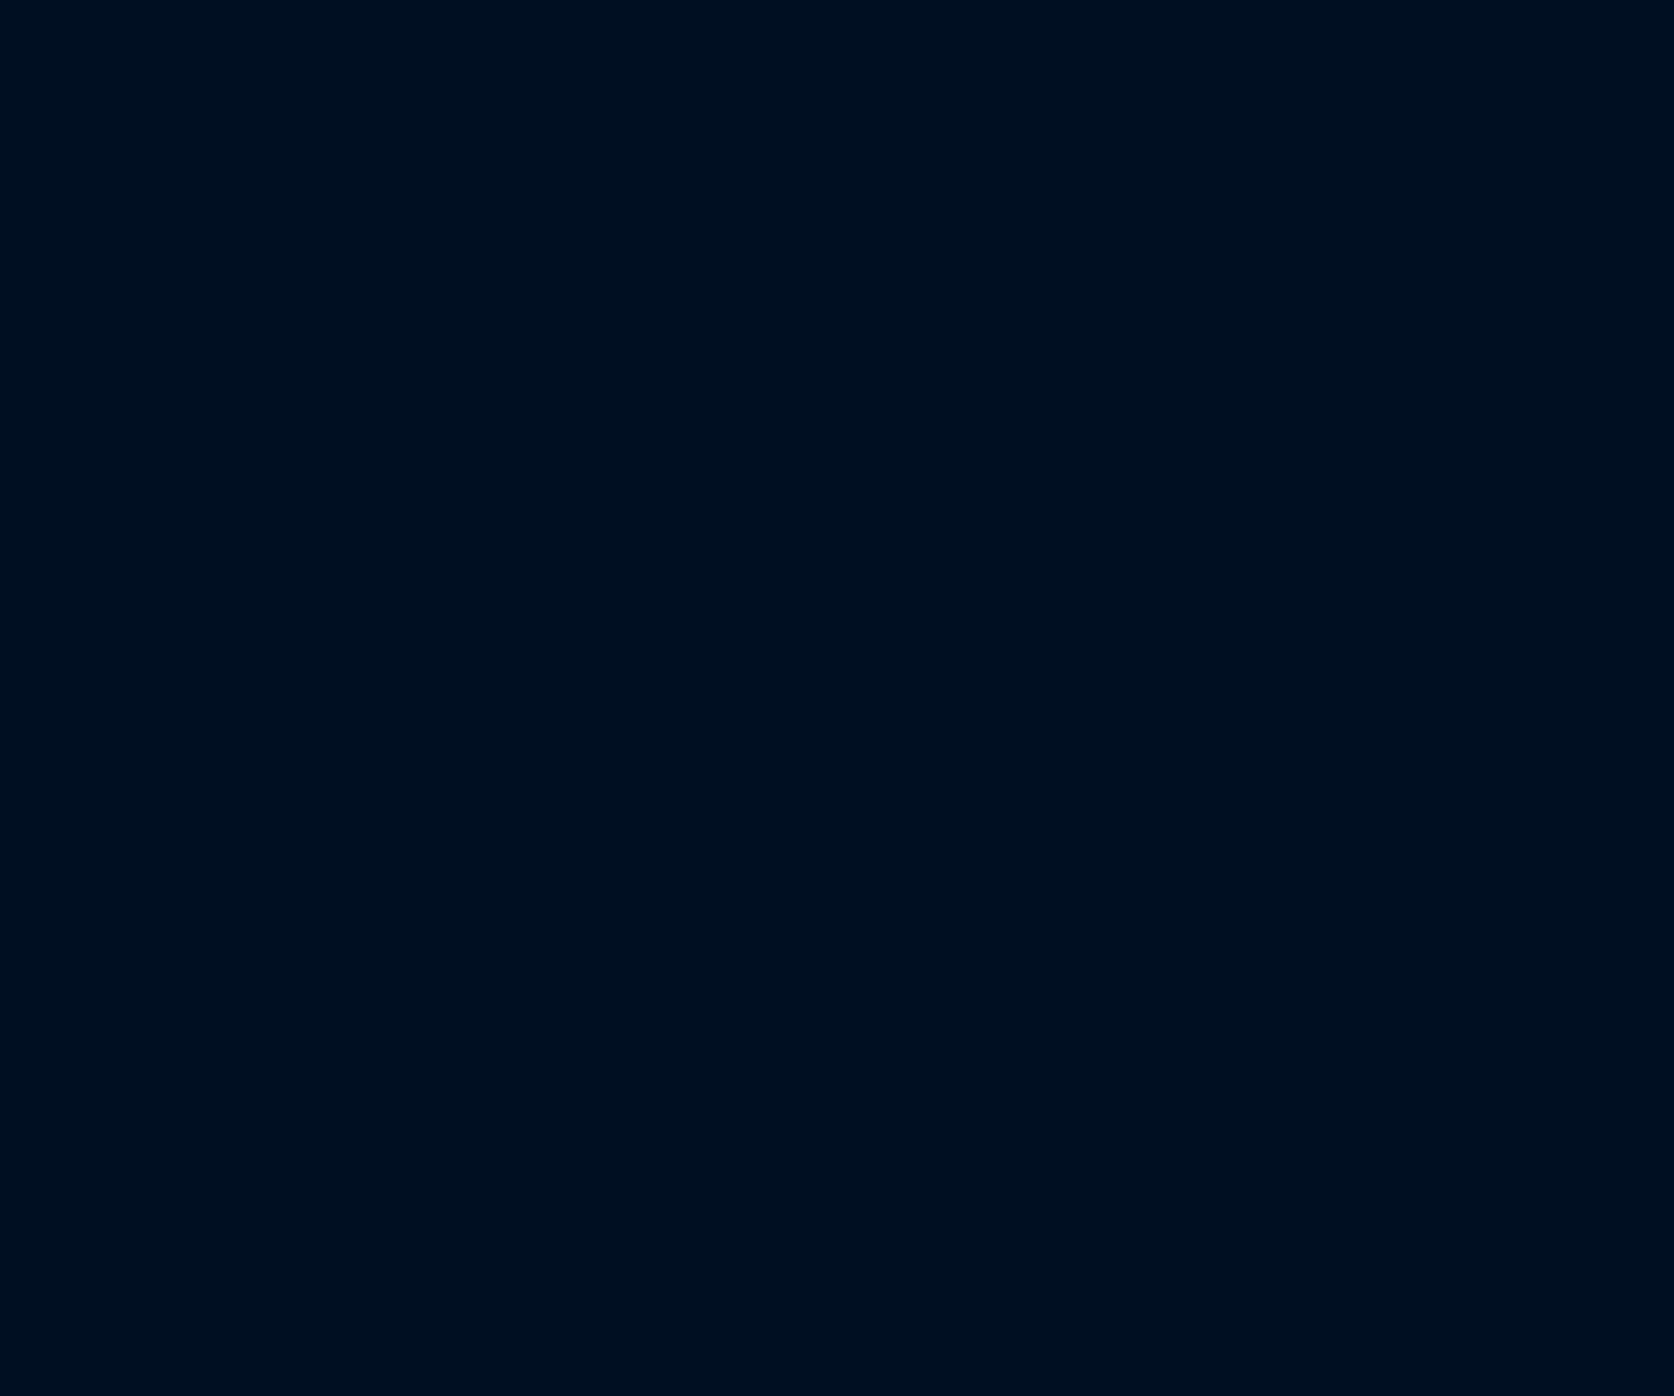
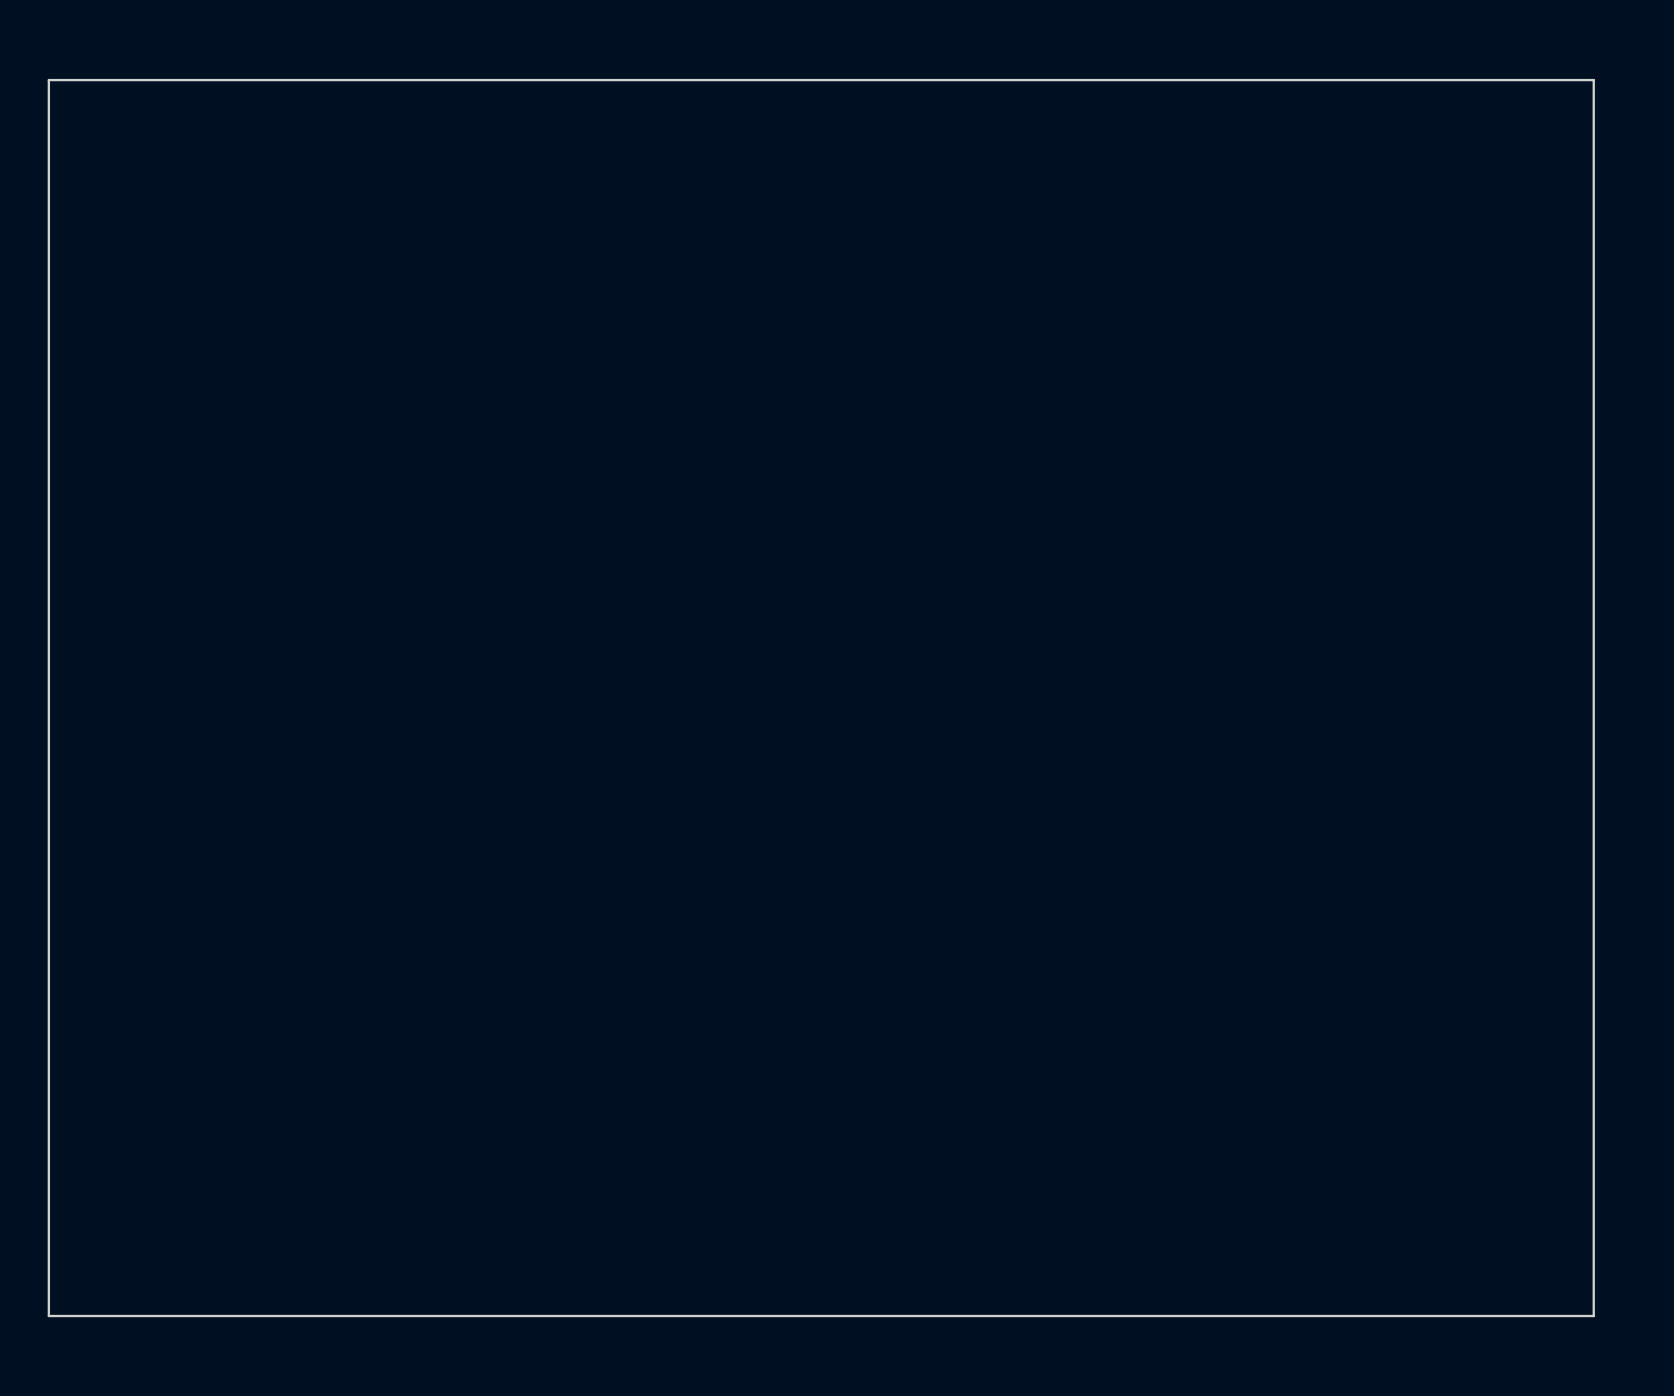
board edge: none -> (1593, 80) (48, 80) (48, 1316) (1593, 1316) (1593, 80)

